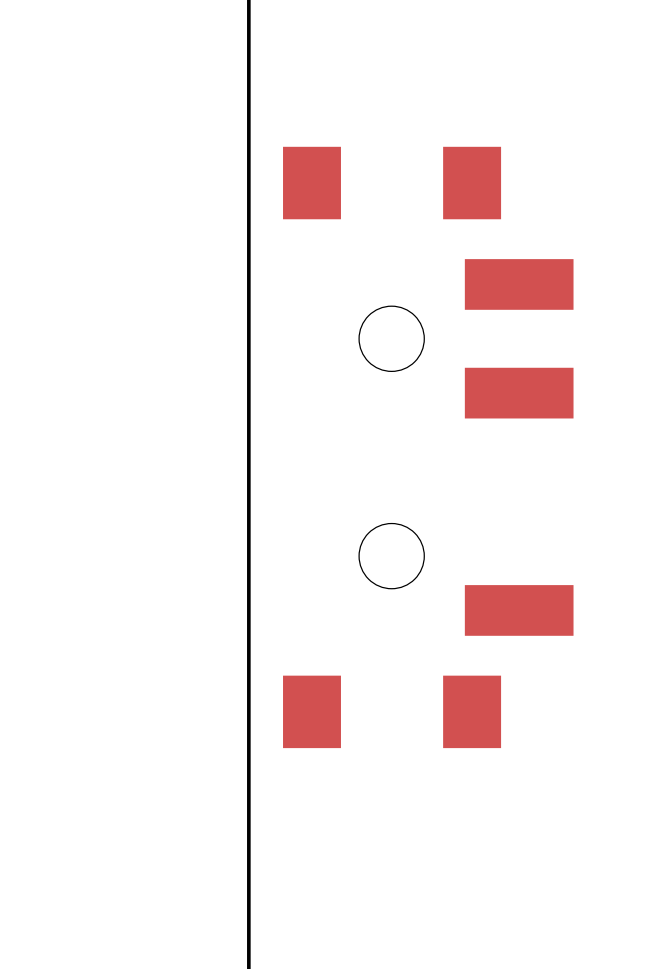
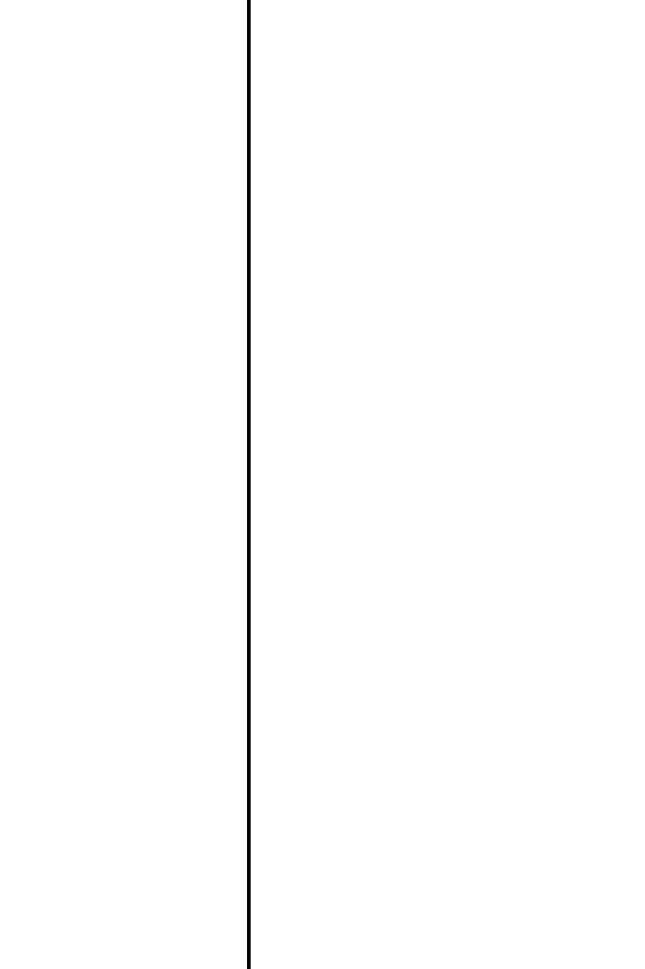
part: (428, 447) -> none

